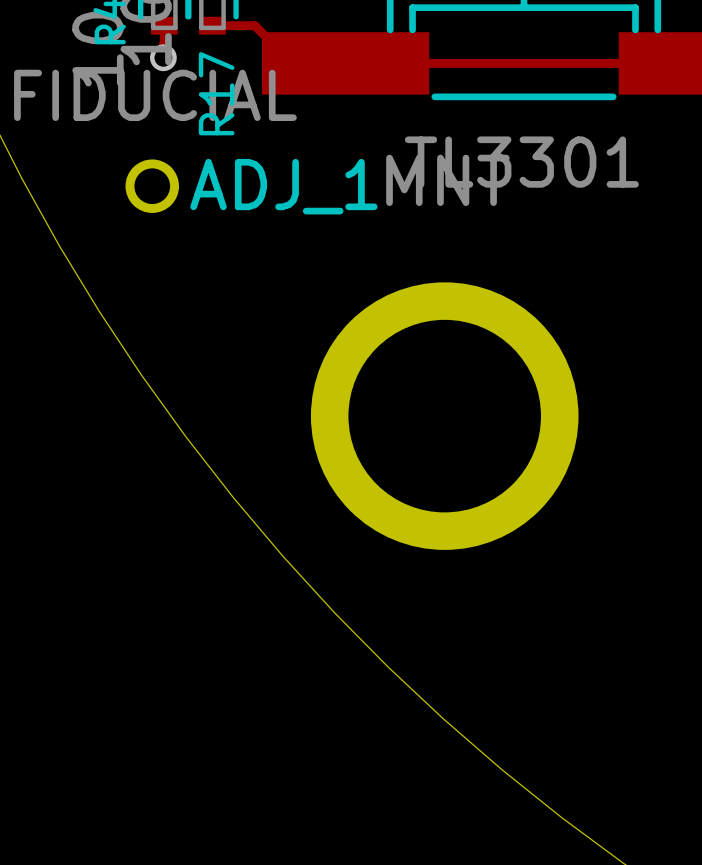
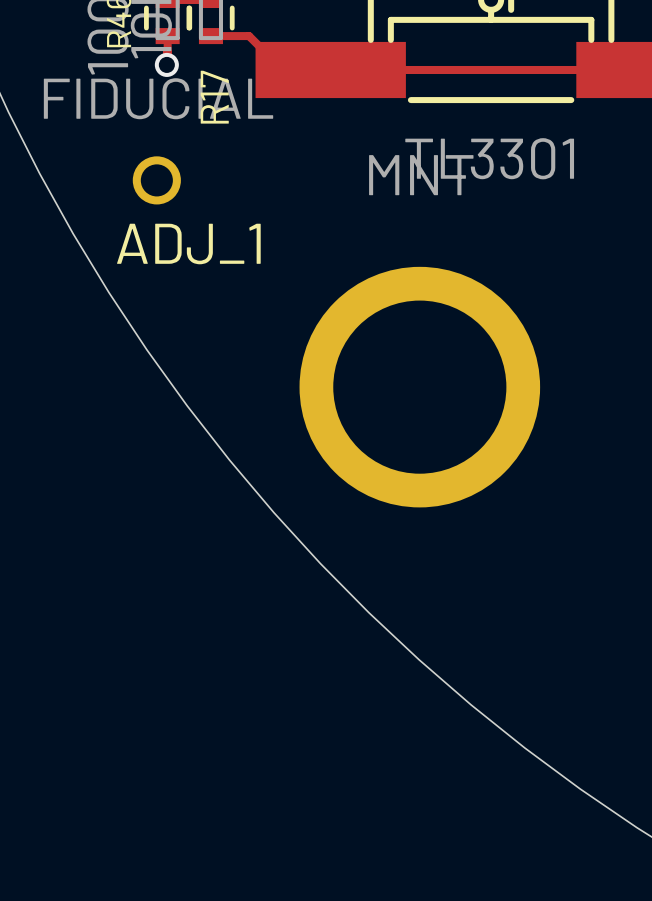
ADJ_1 name position: ADJ_1 (283, 186) -> ADJ_1 (188, 244)

